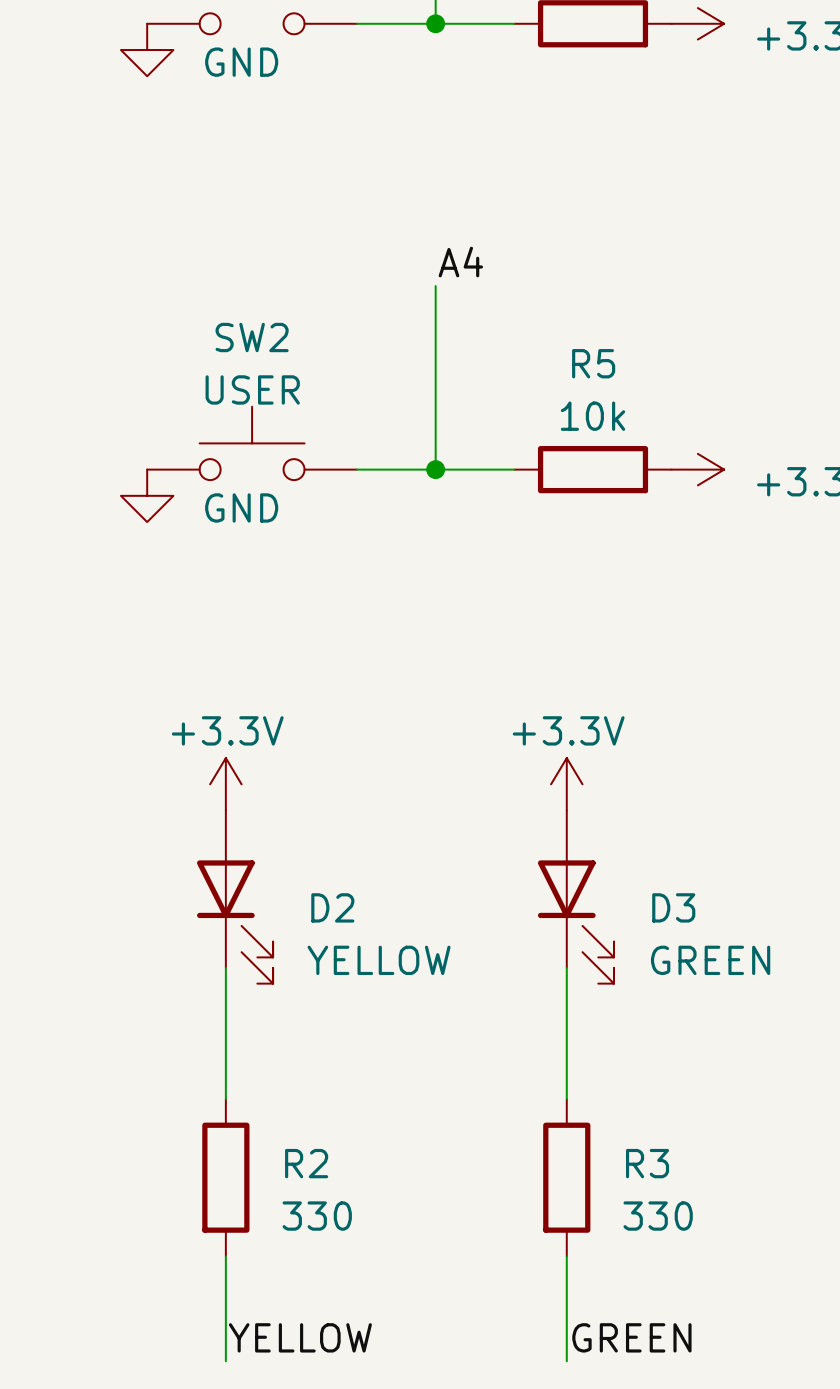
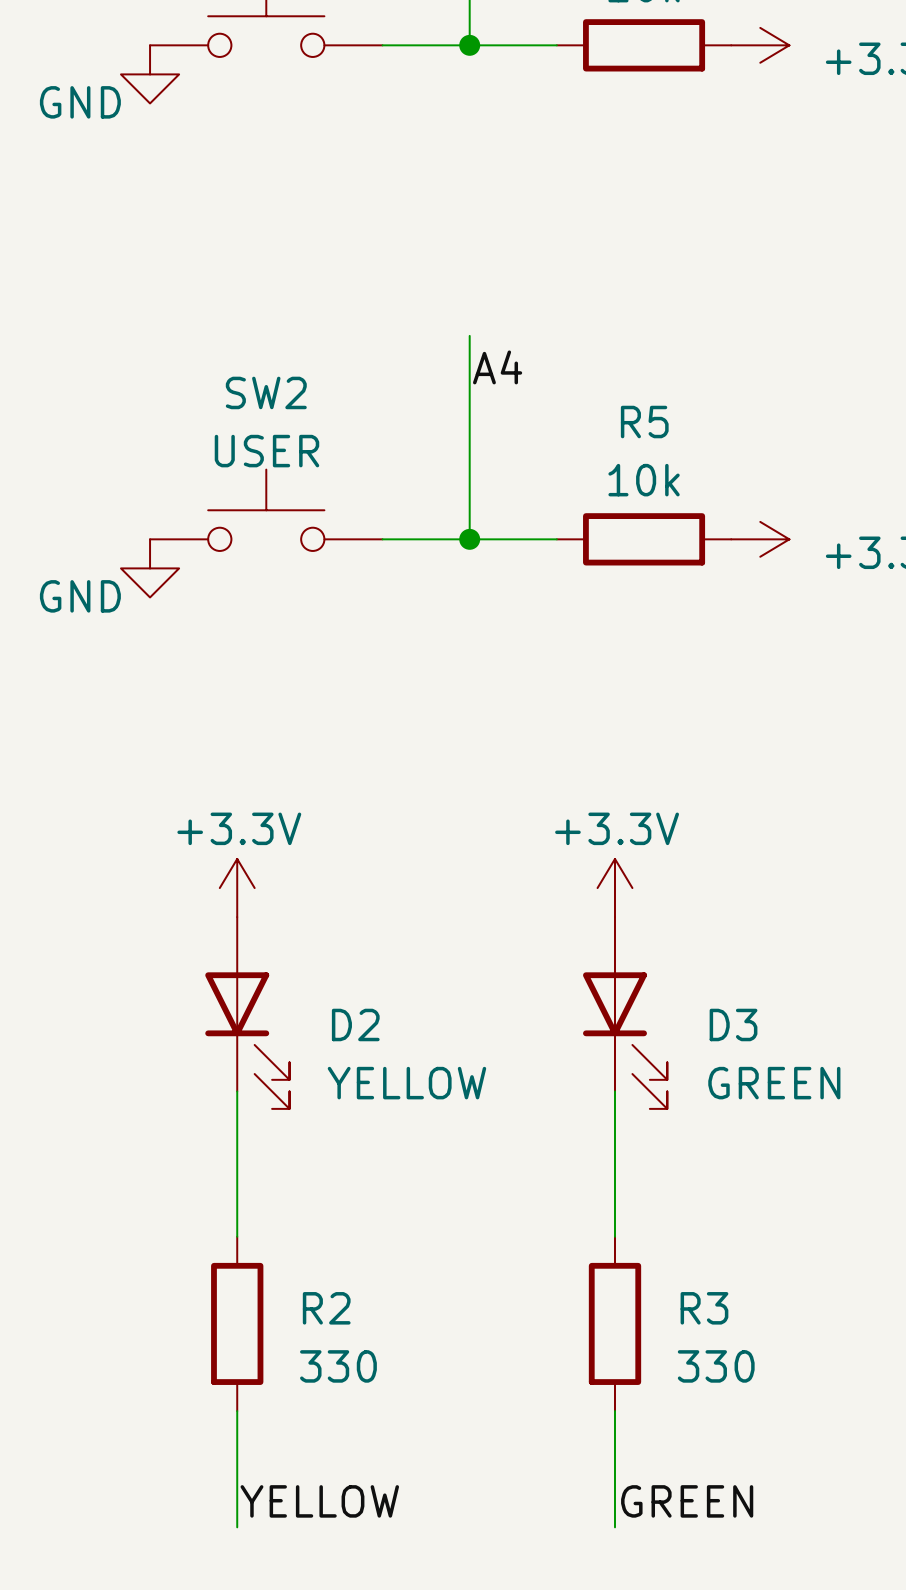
power symbol text position: GND (241, 62) -> GND (80, 102)
label position: A4 (460, 262) -> A4 (497, 367)
power symbol text position: GND (241, 507) -> GND (80, 596)

